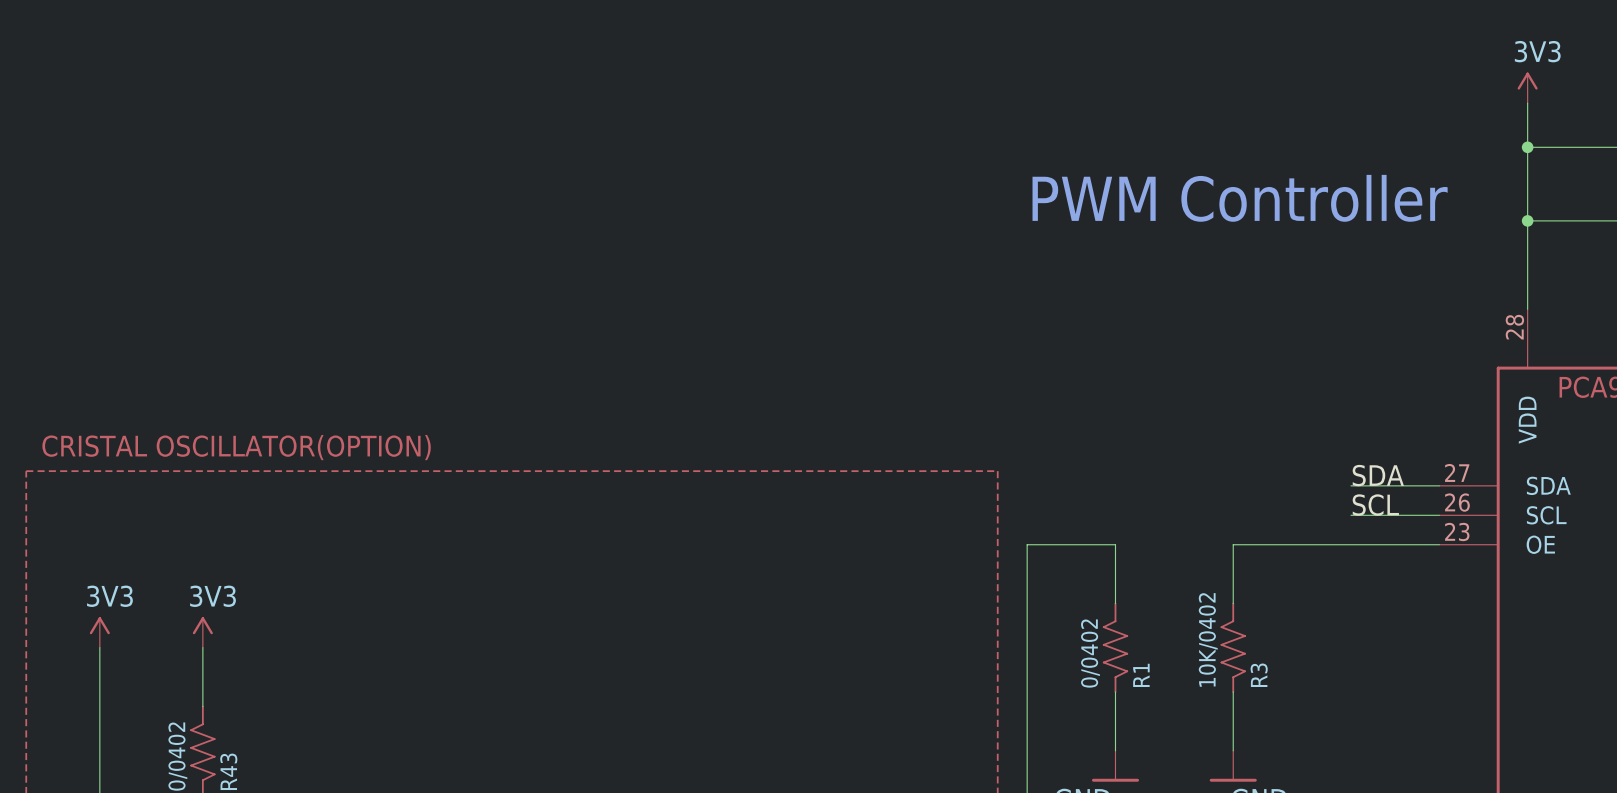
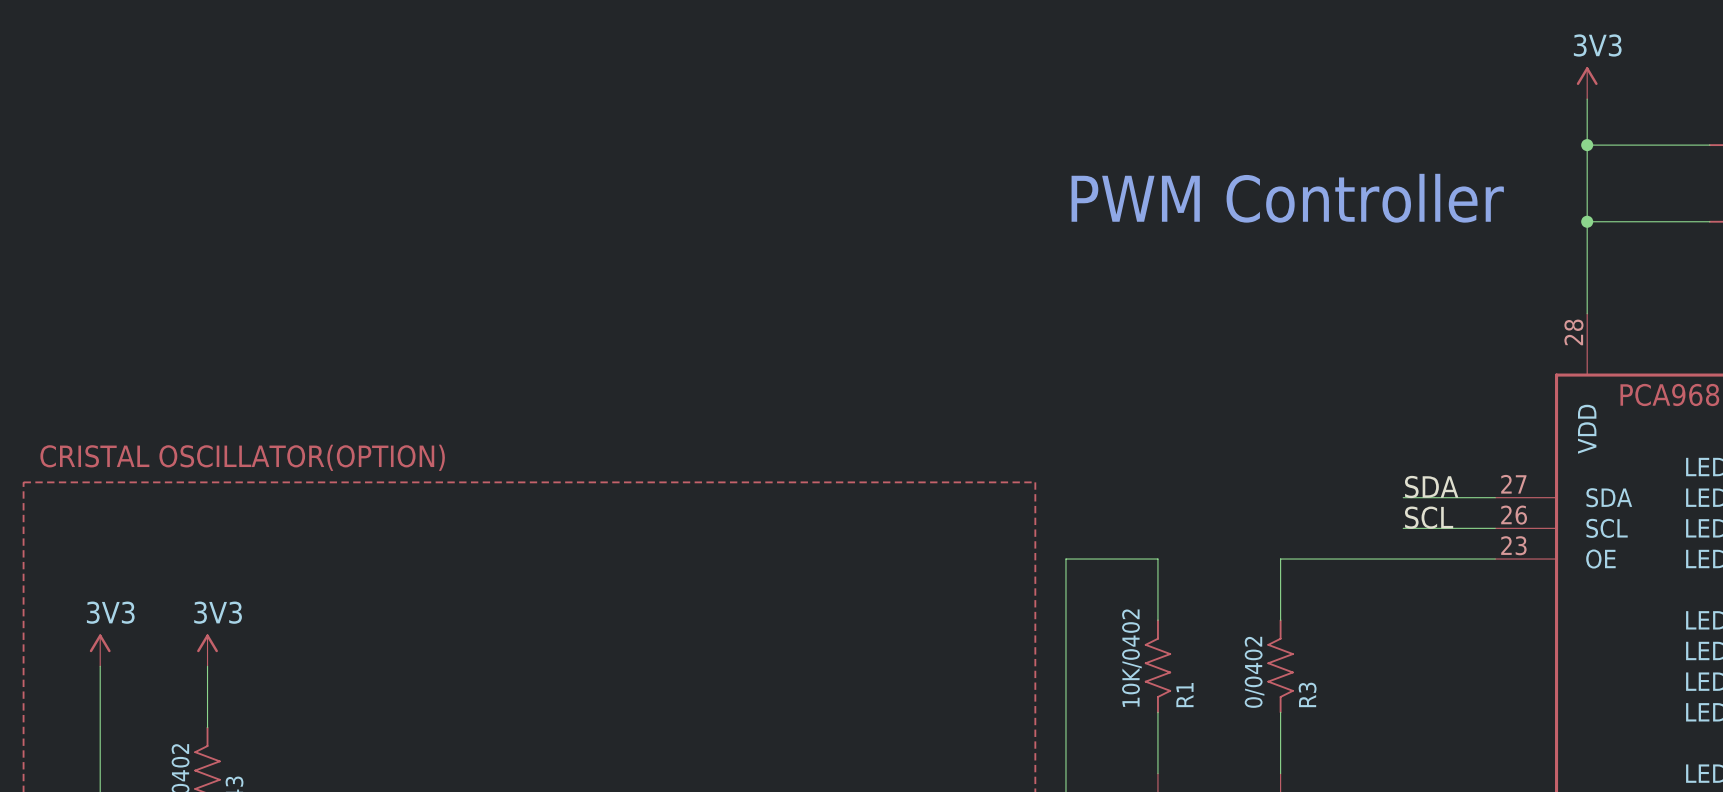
R3 value: 10K/0402 (1208, 639) -> 0/0402 (1254, 672)
R1 value: 0/0402 (1090, 653) -> 10K/0402 (1131, 658)

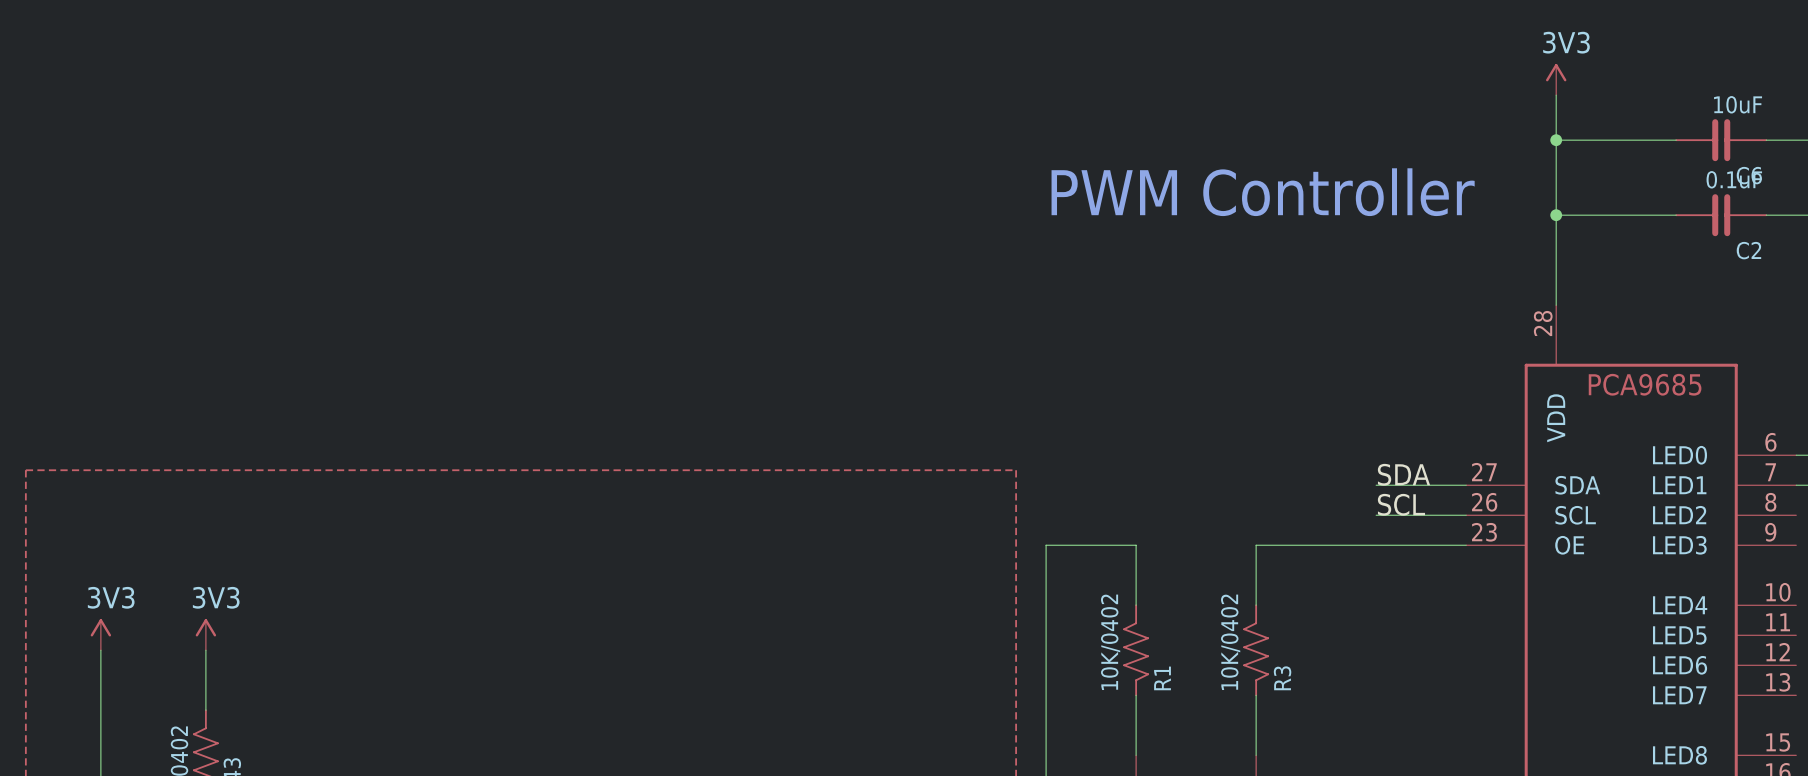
text: CRISTAL OSCILLATOR(OPTION) (242, 457) -> none
R3 value: 0/0402 (1254, 672) -> 10K/0402 (1230, 642)

